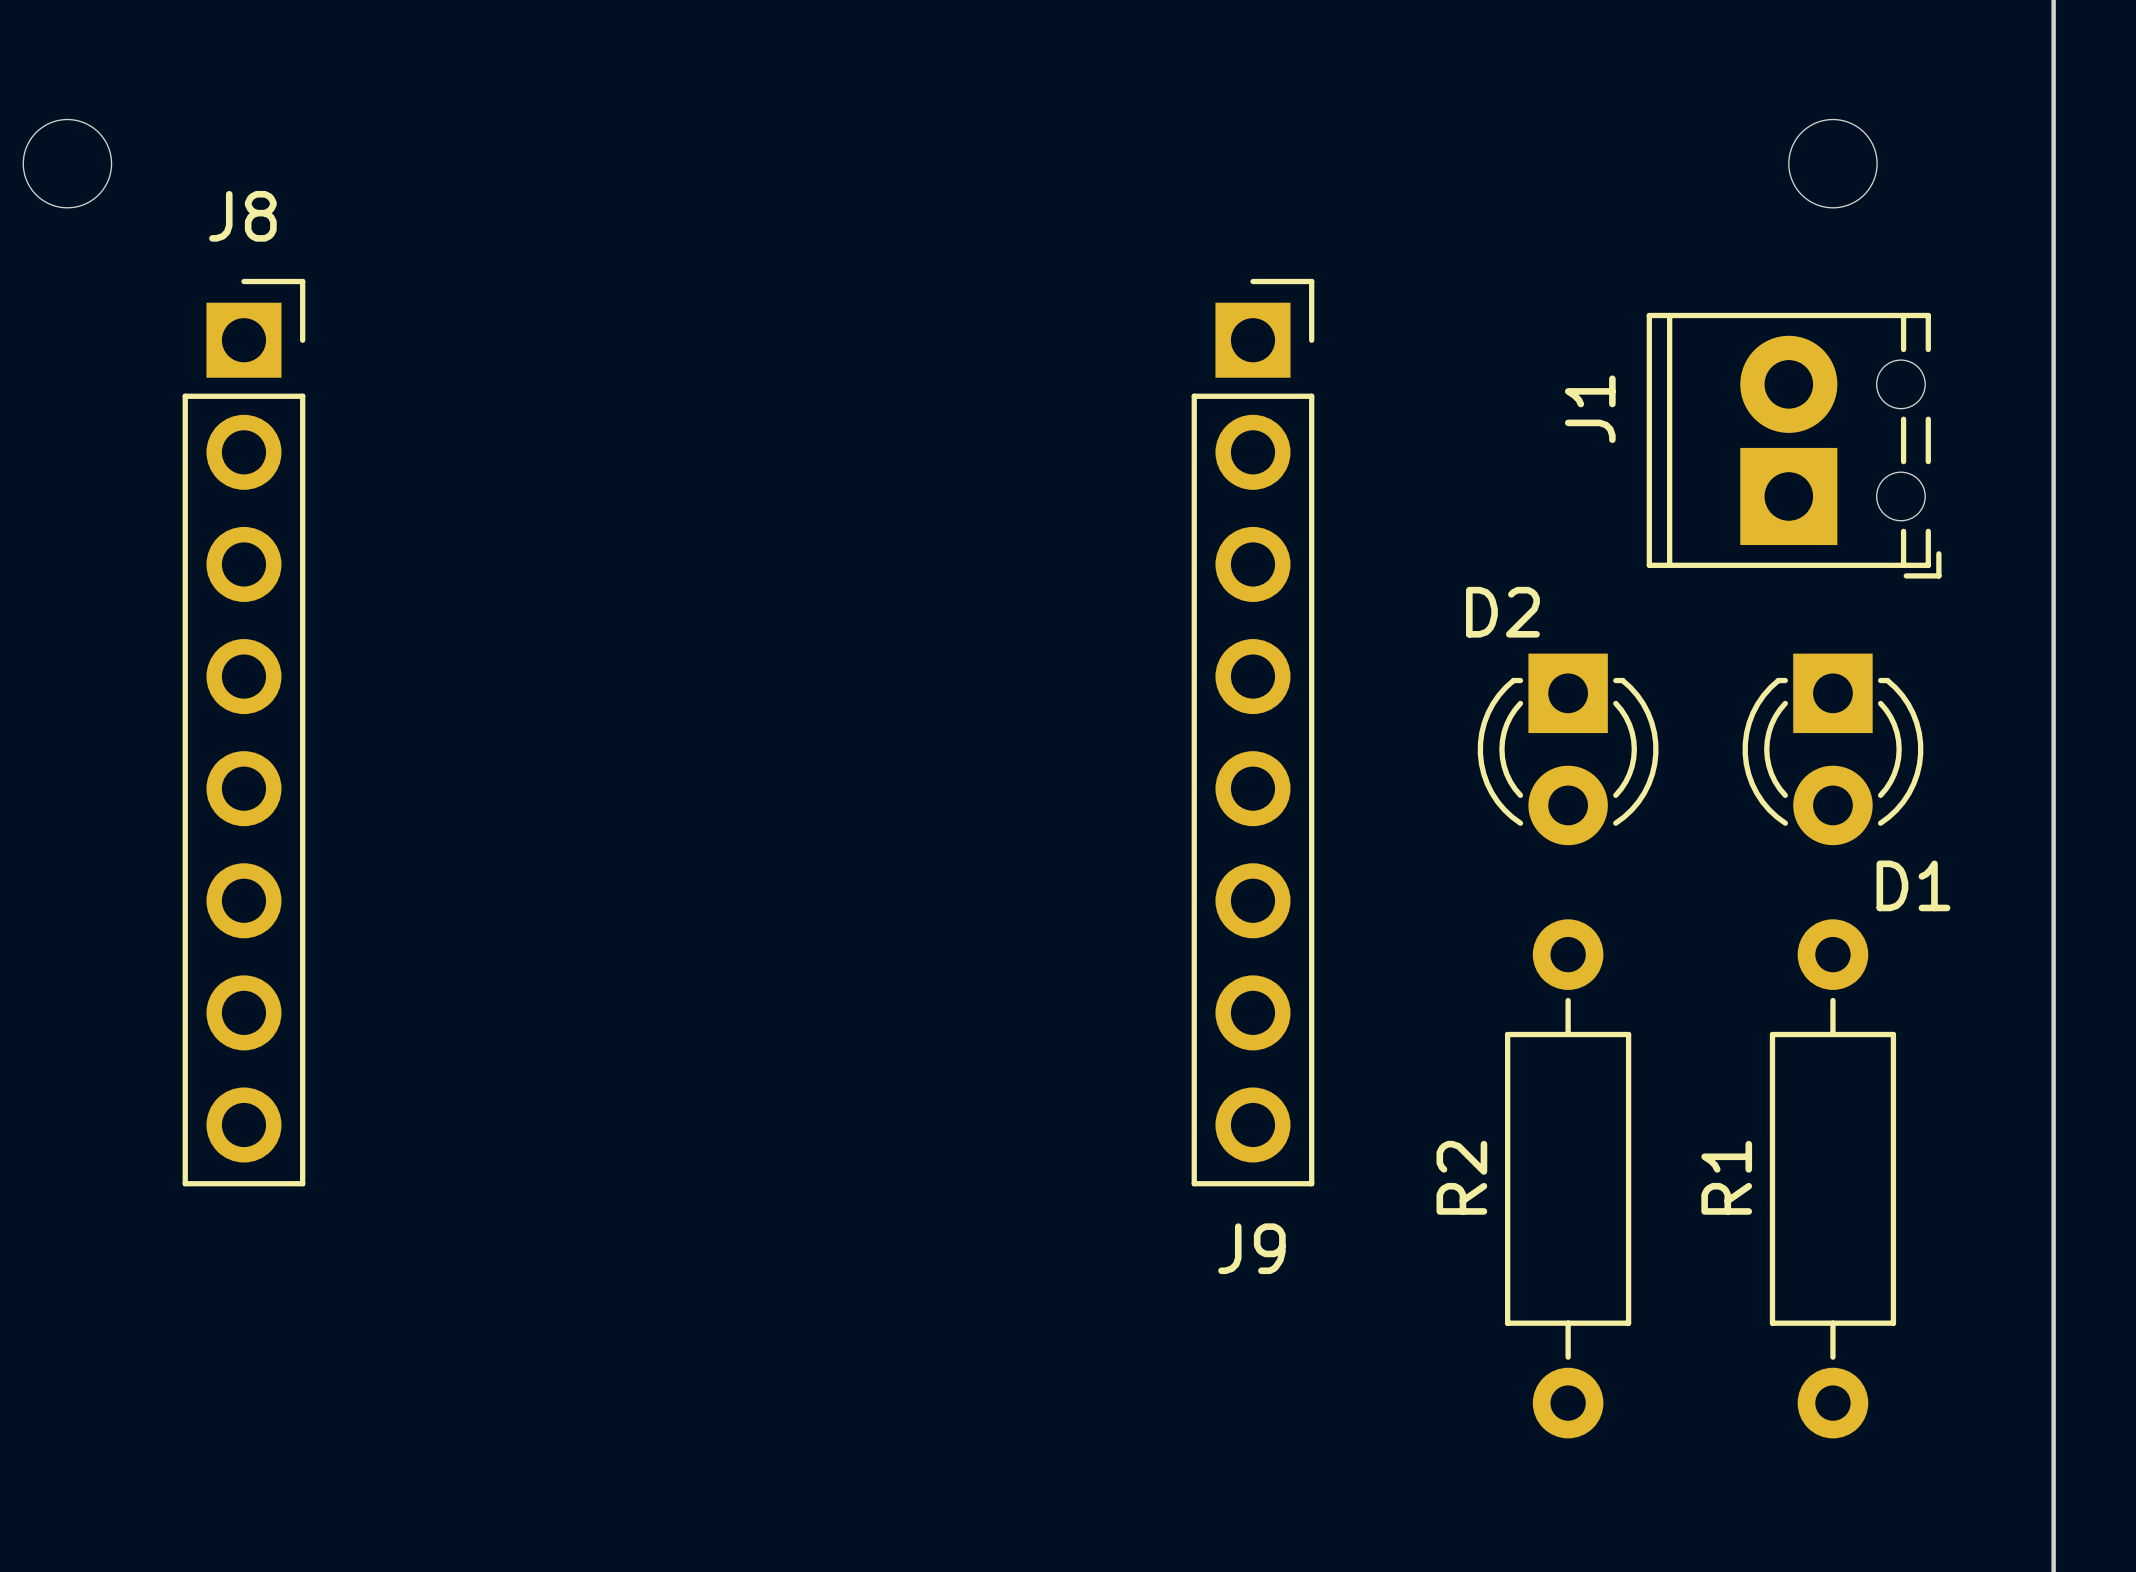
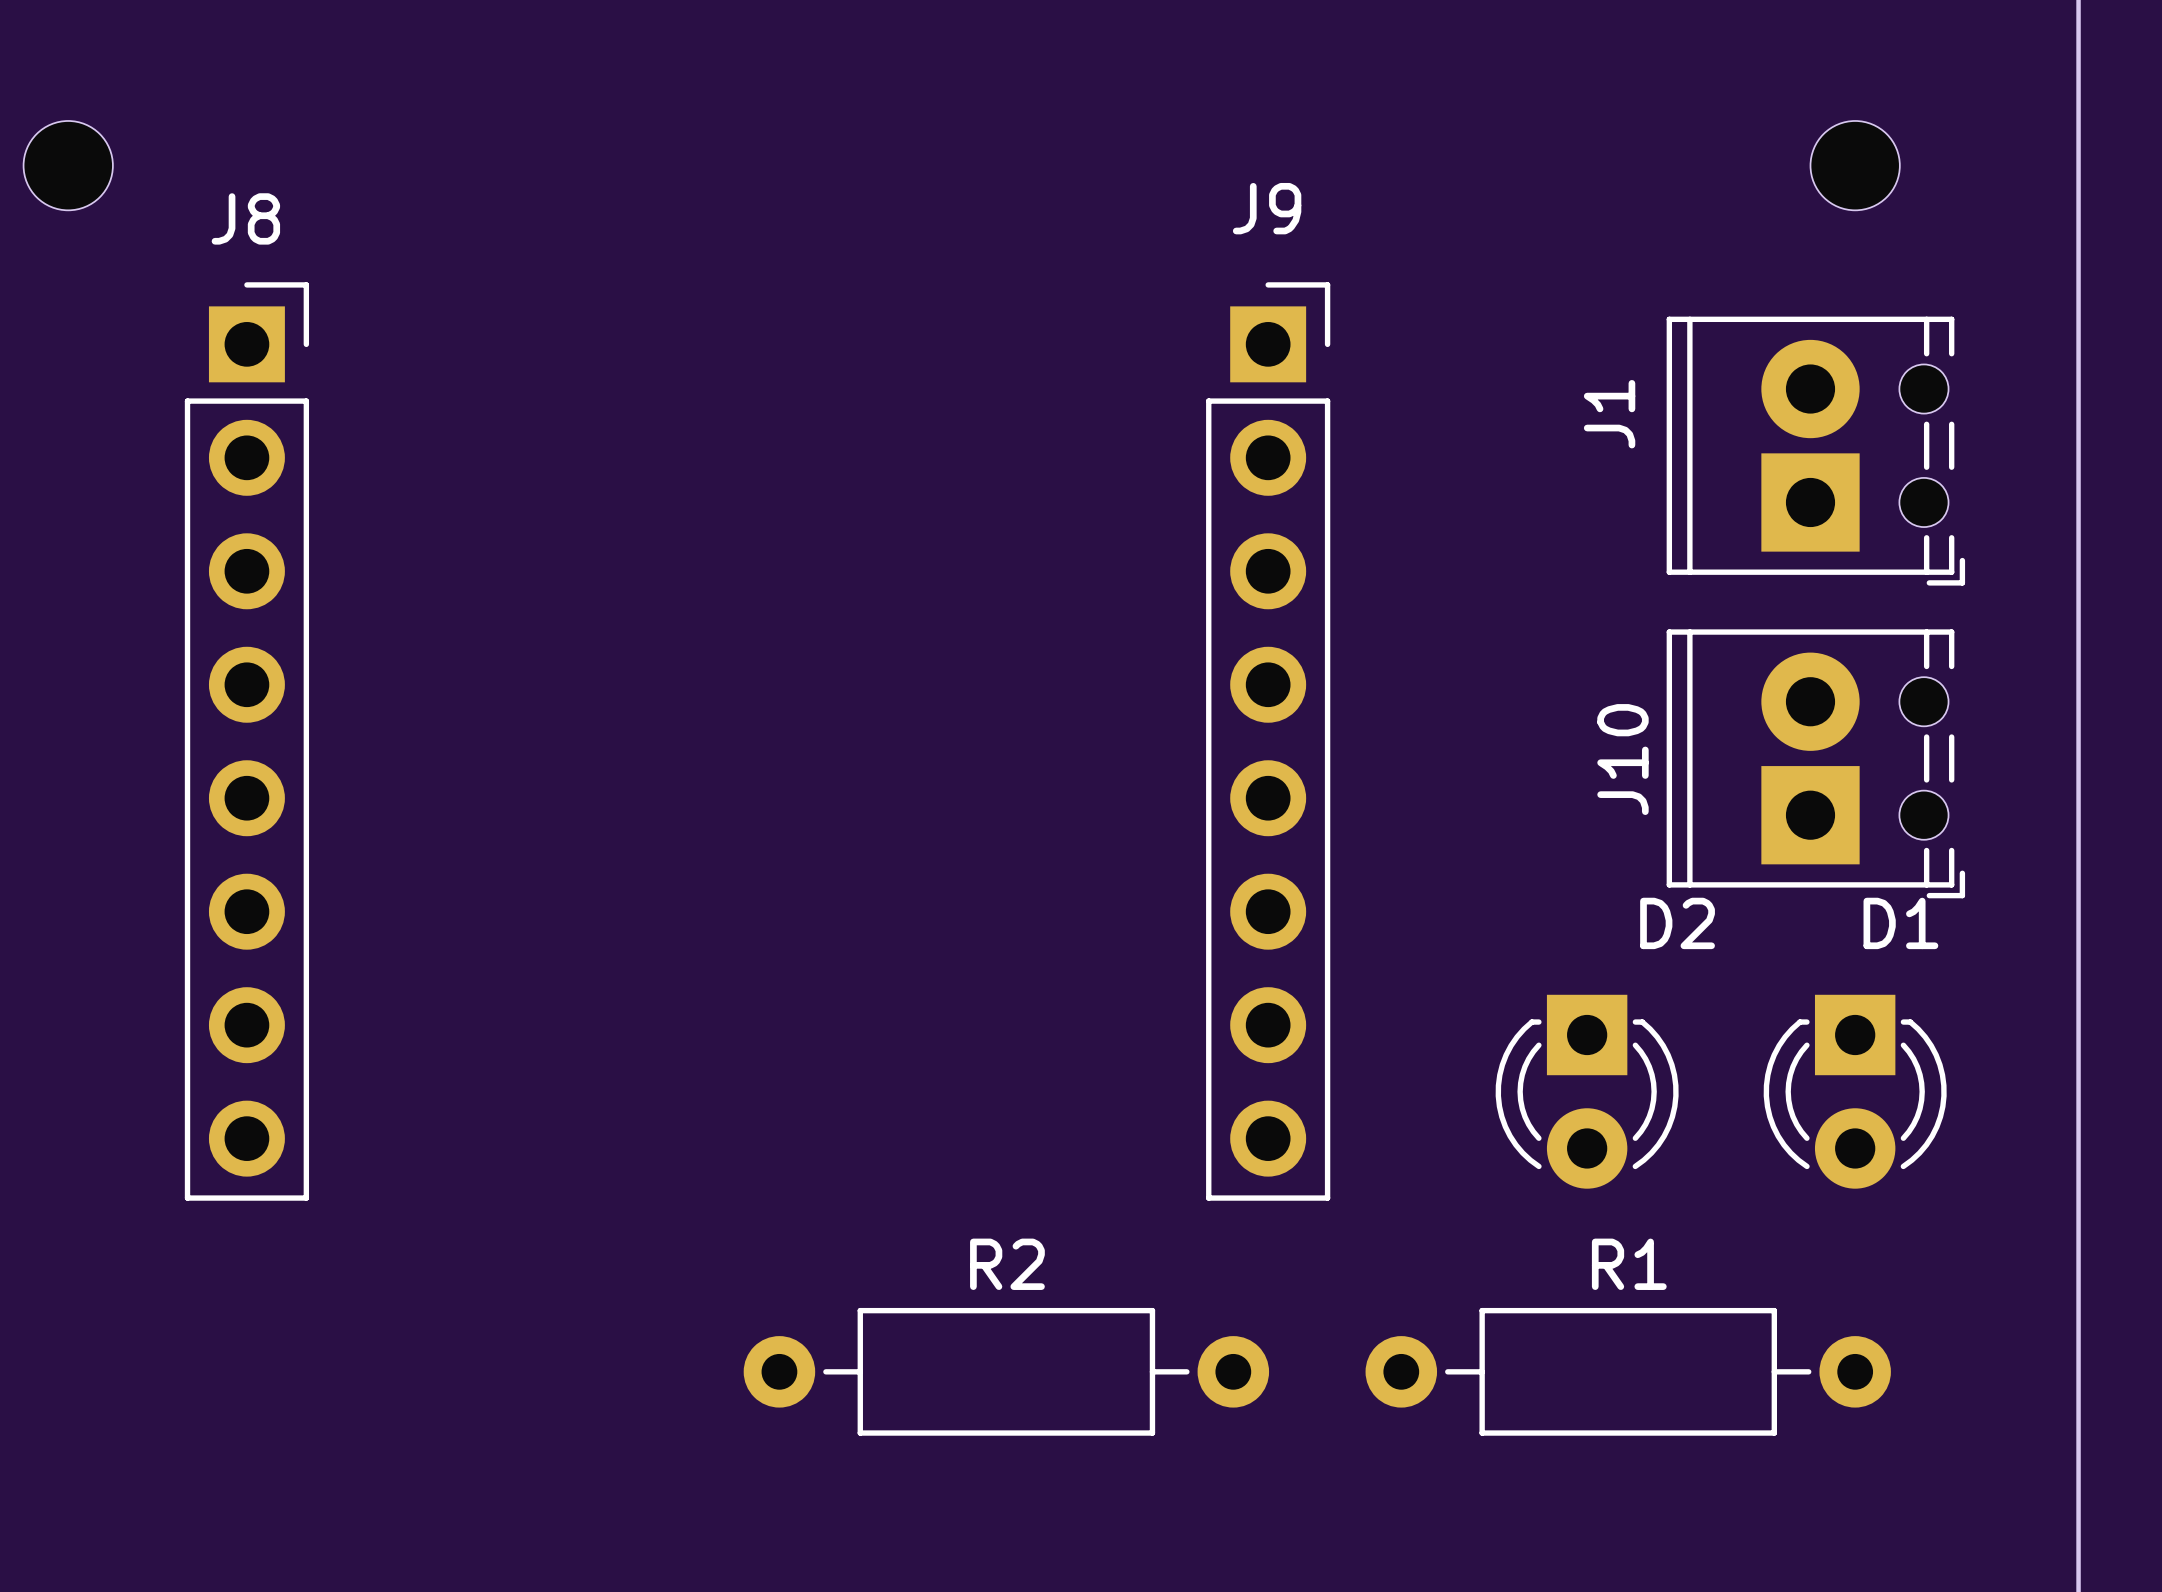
D2 name position: D2 (1502, 612) -> D2 (1677, 923)
D2 position: (1568, 749) -> (1587, 1091)
D1 position: (1832, 749) -> (1855, 1091)
J10: none -> (1815, 763)
D1 name position: D1 (1913, 885) -> D1 (1900, 923)
R2 rotation: 0° (1568, 1178) -> 90° clockwise (1006, 1371)
R2 position: (1568, 1178) -> (1006, 1371)
R1 rotation: 0° (1832, 1178) -> 90° clockwise (1628, 1371)
J9 name position: J9 (1251, 1248) -> J9 (1267, 208)

